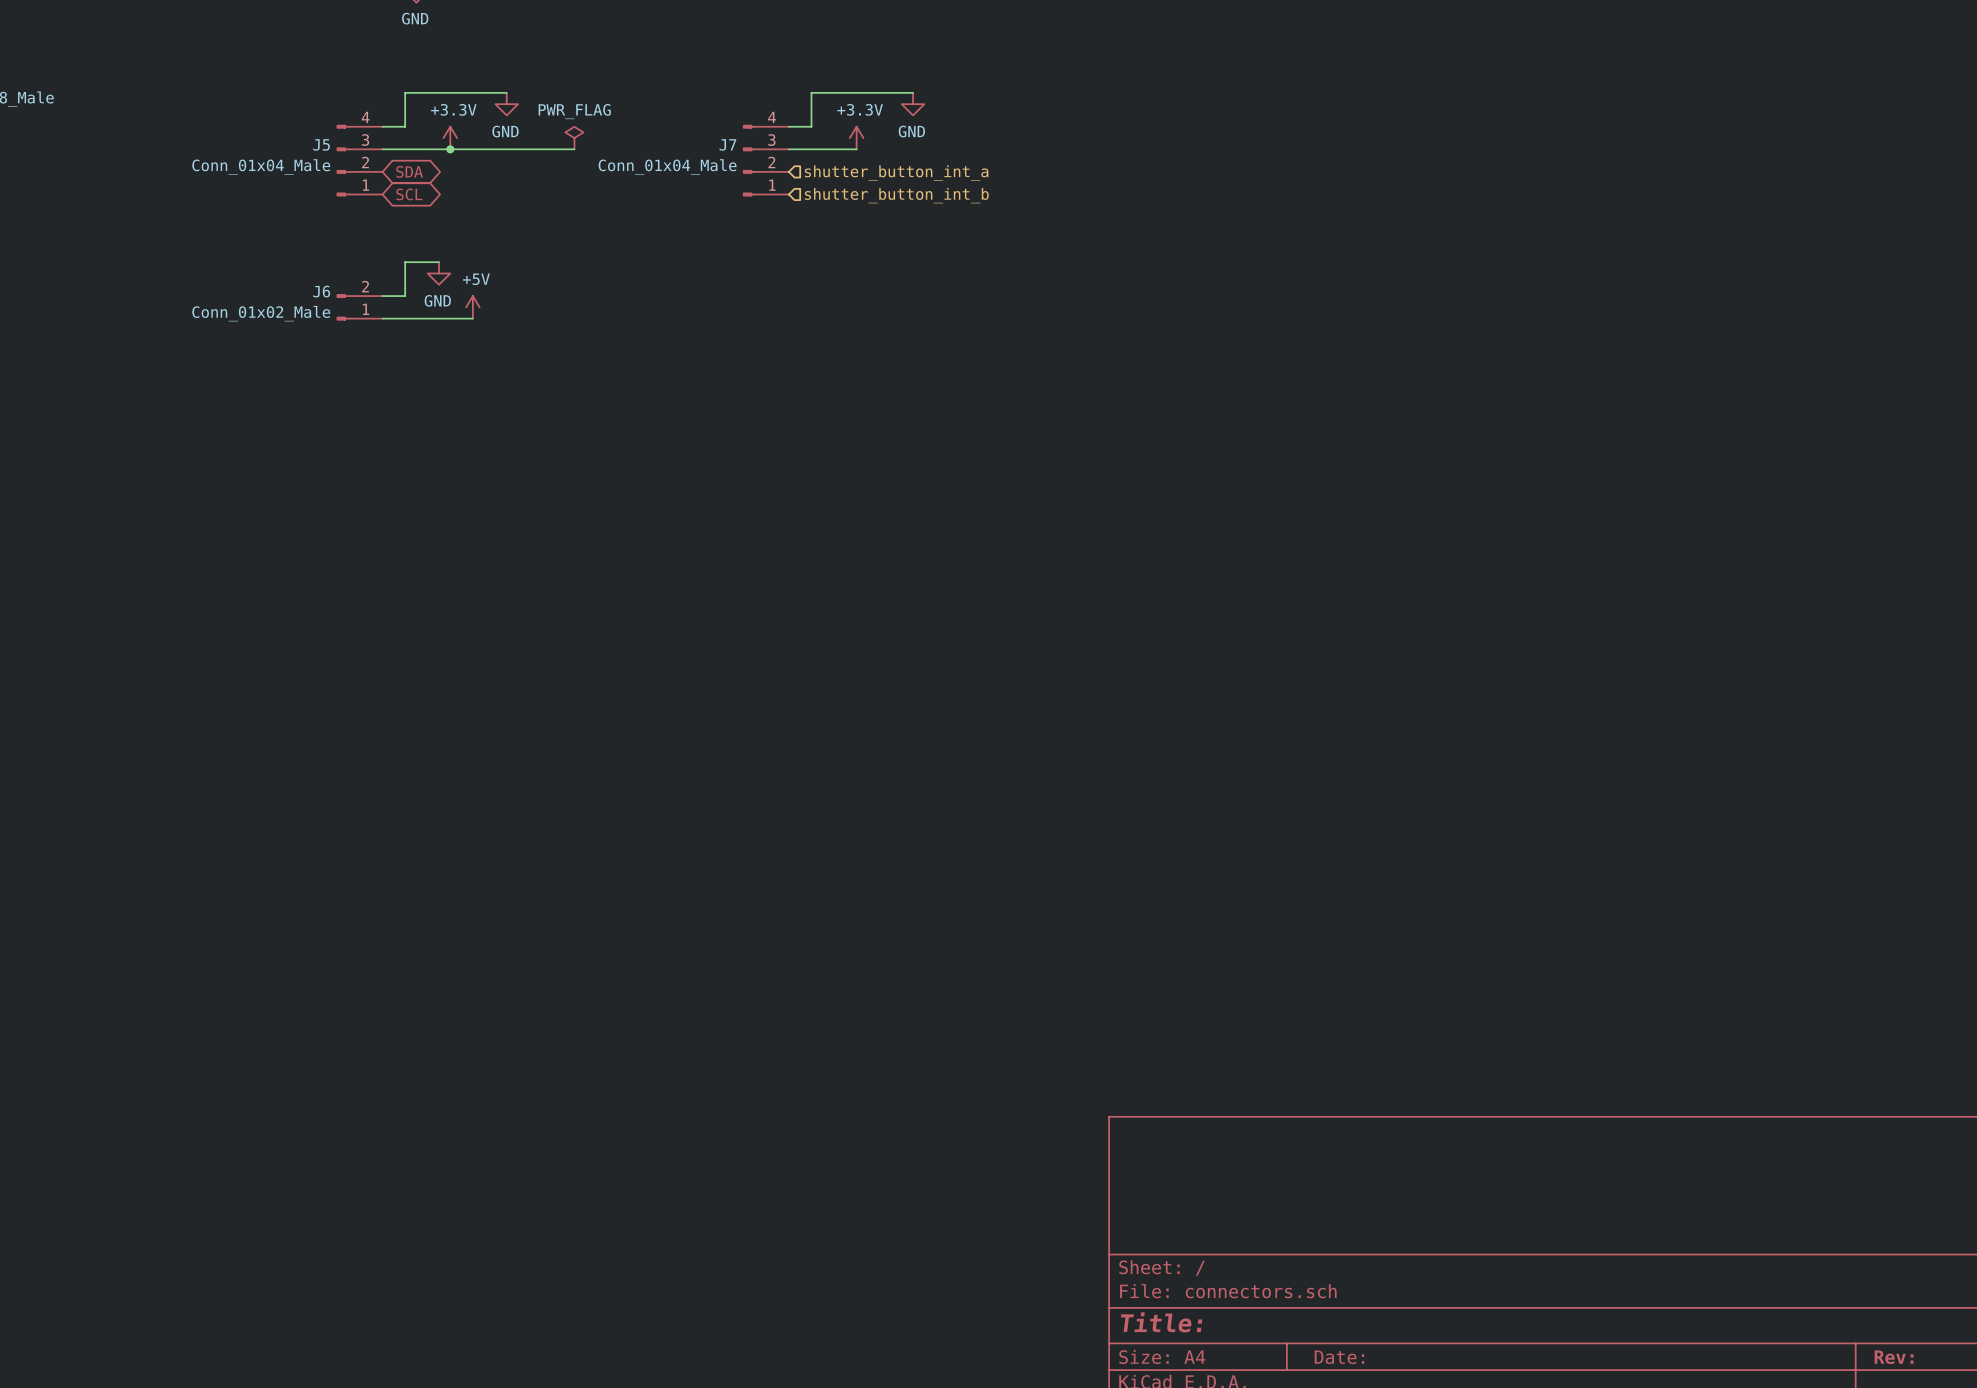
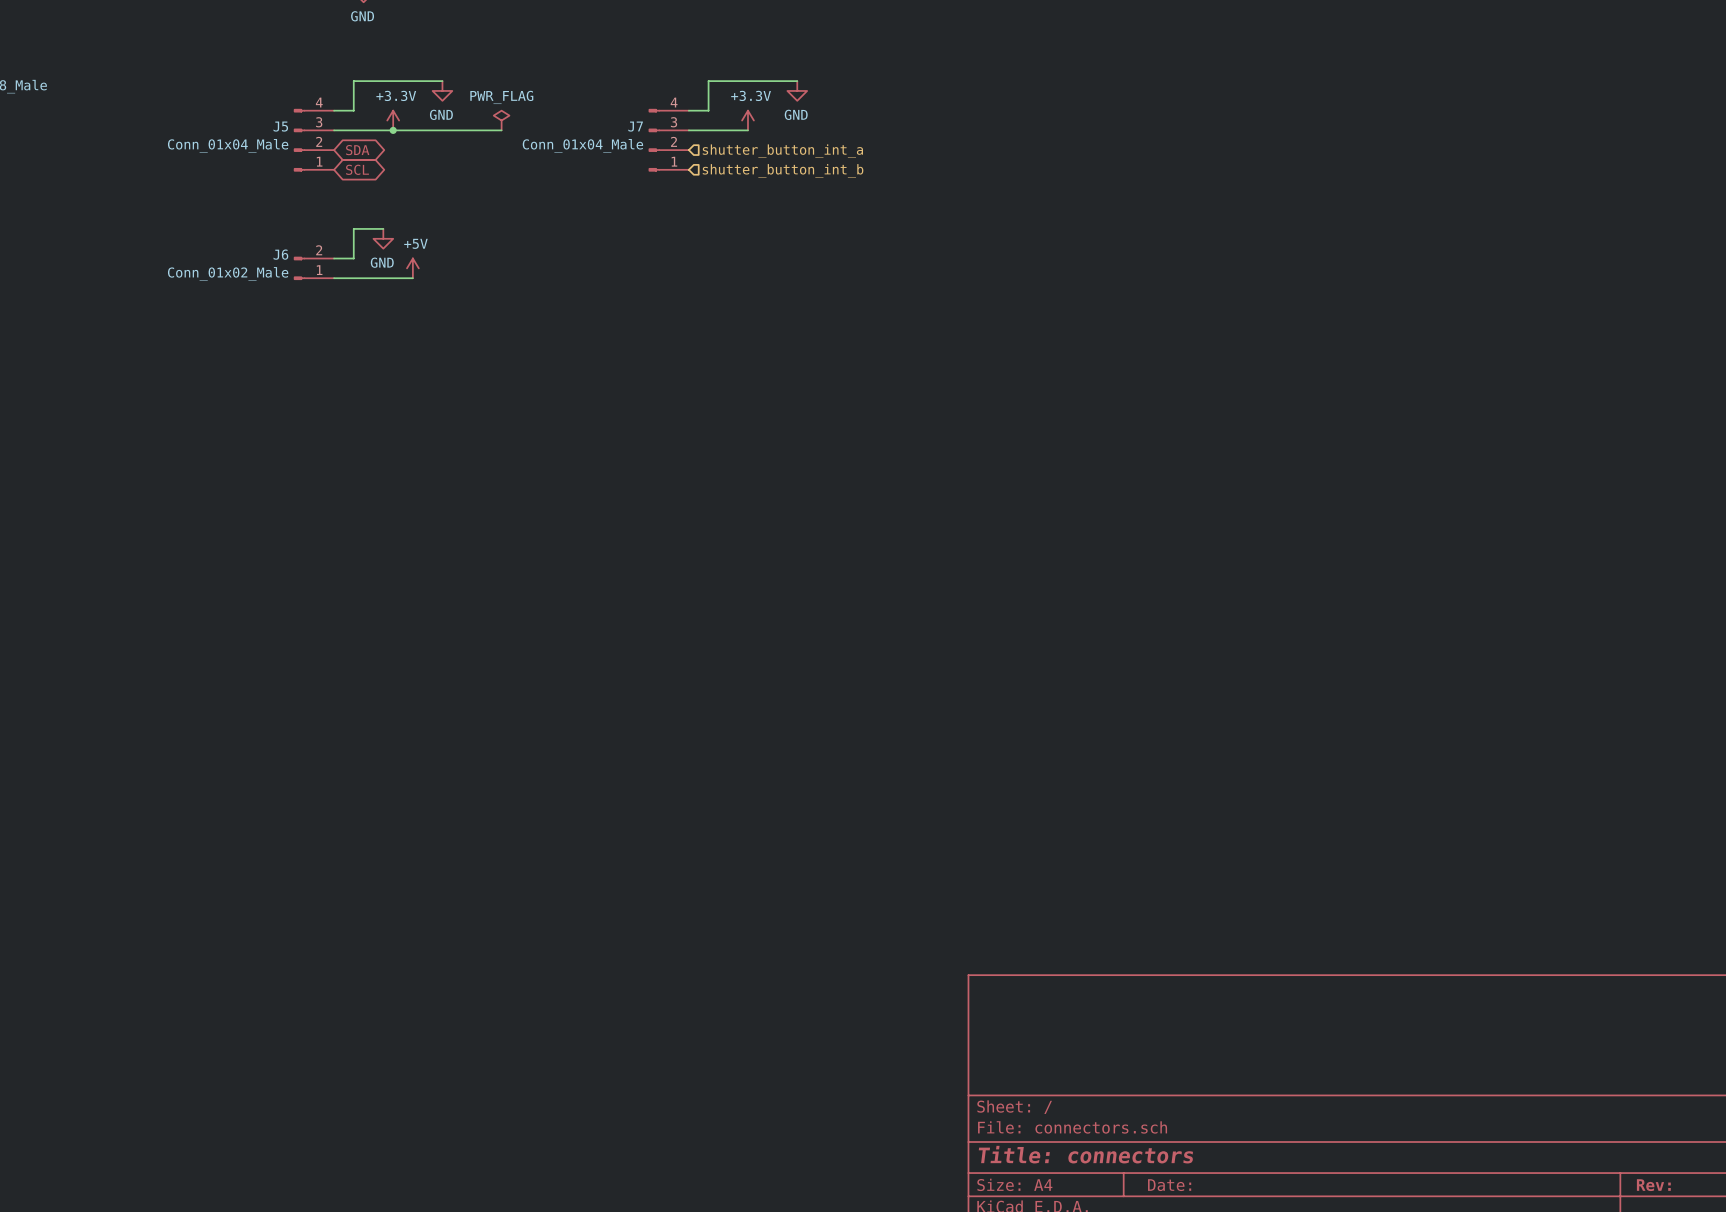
title block: Title: (1161, 1322) -> Title: connectors (1085, 1154)

